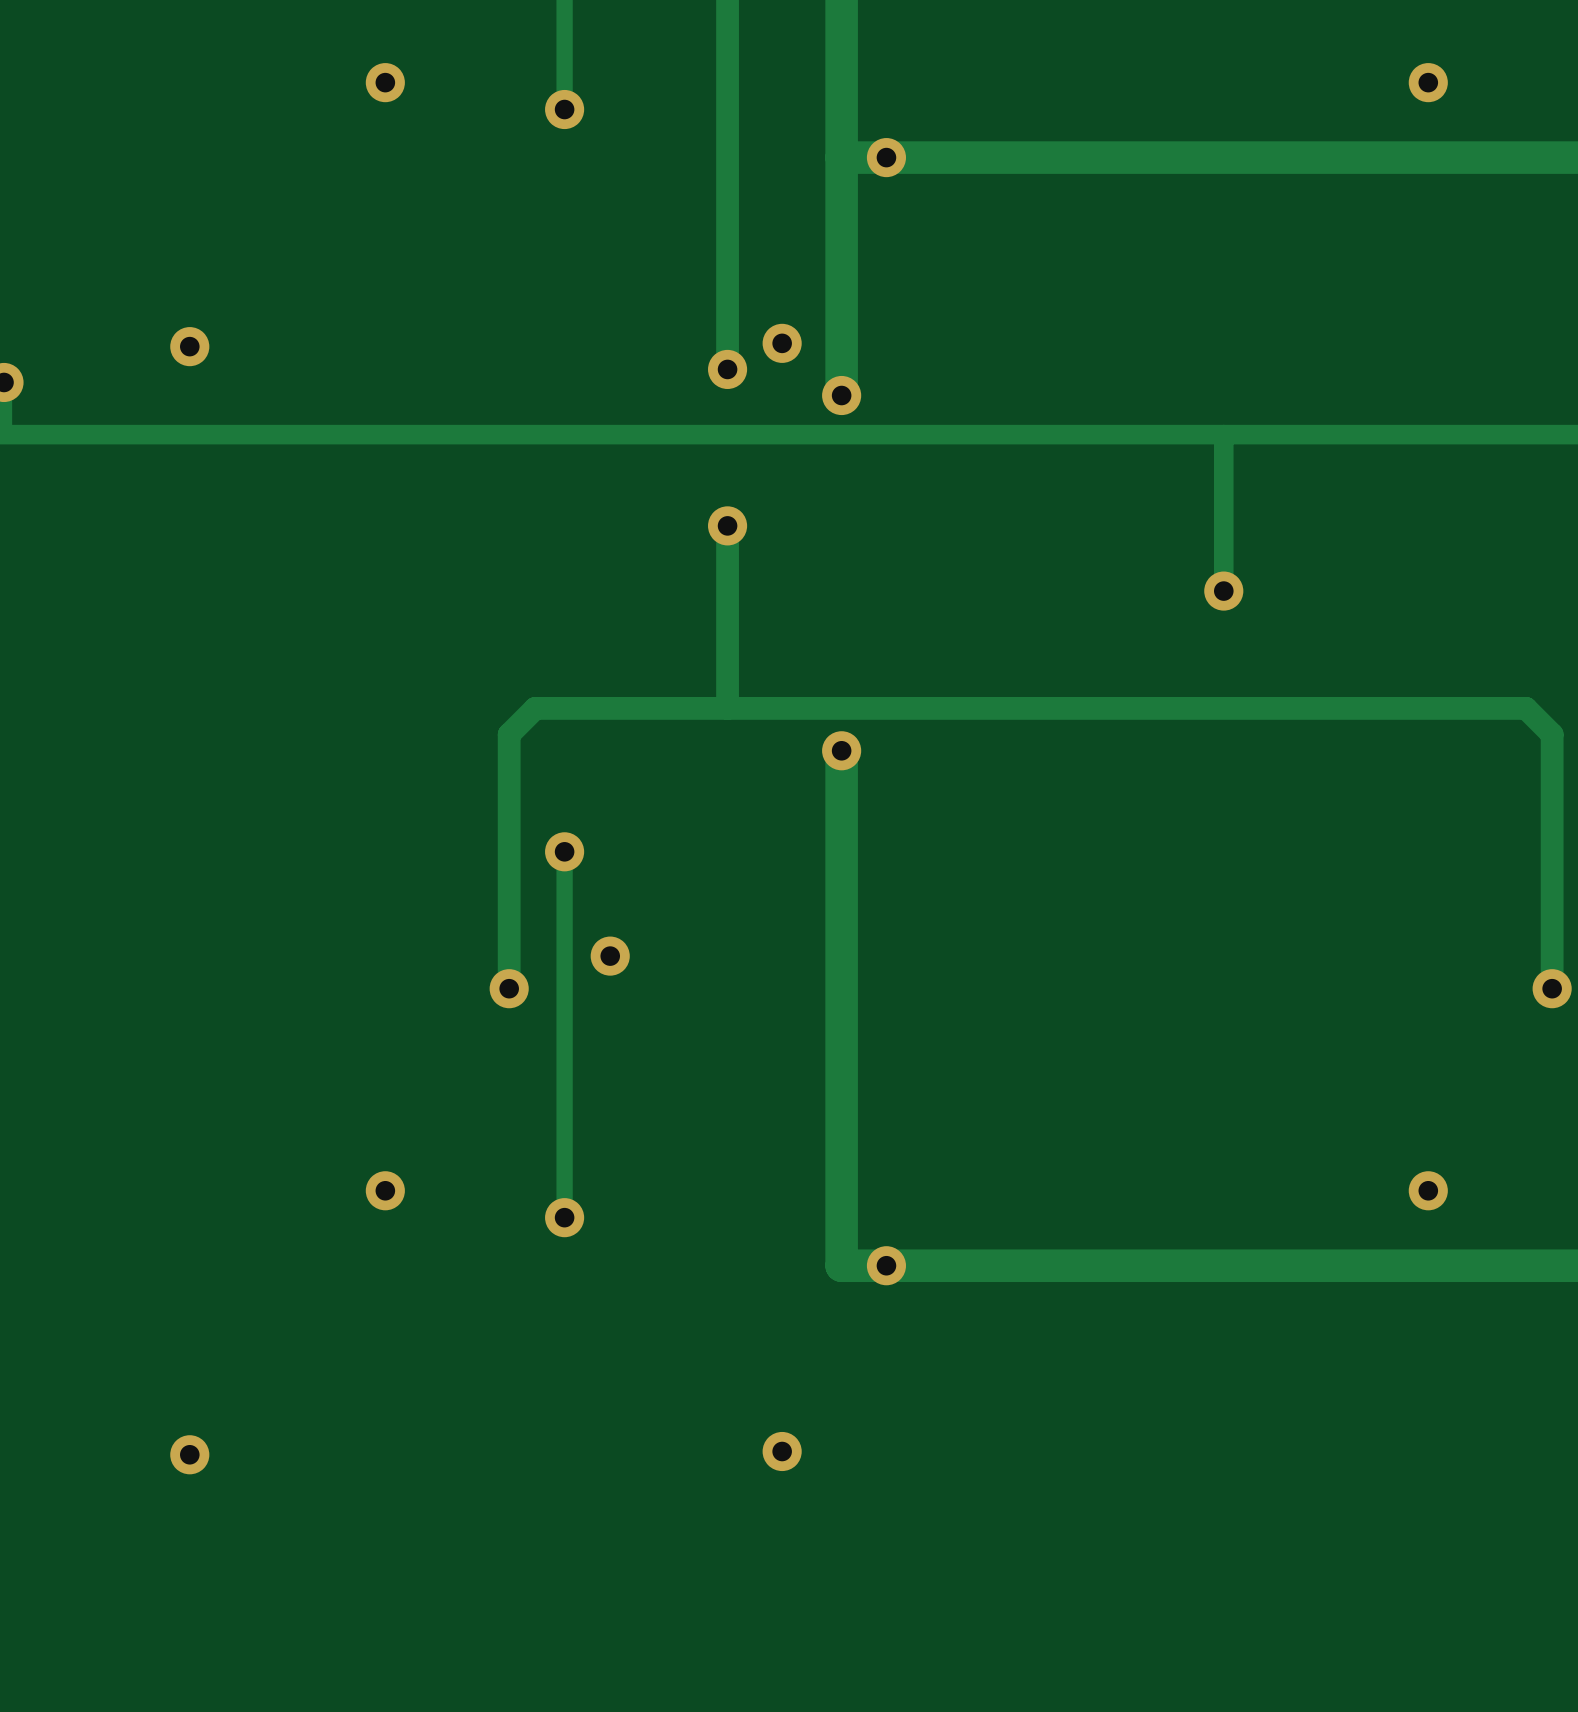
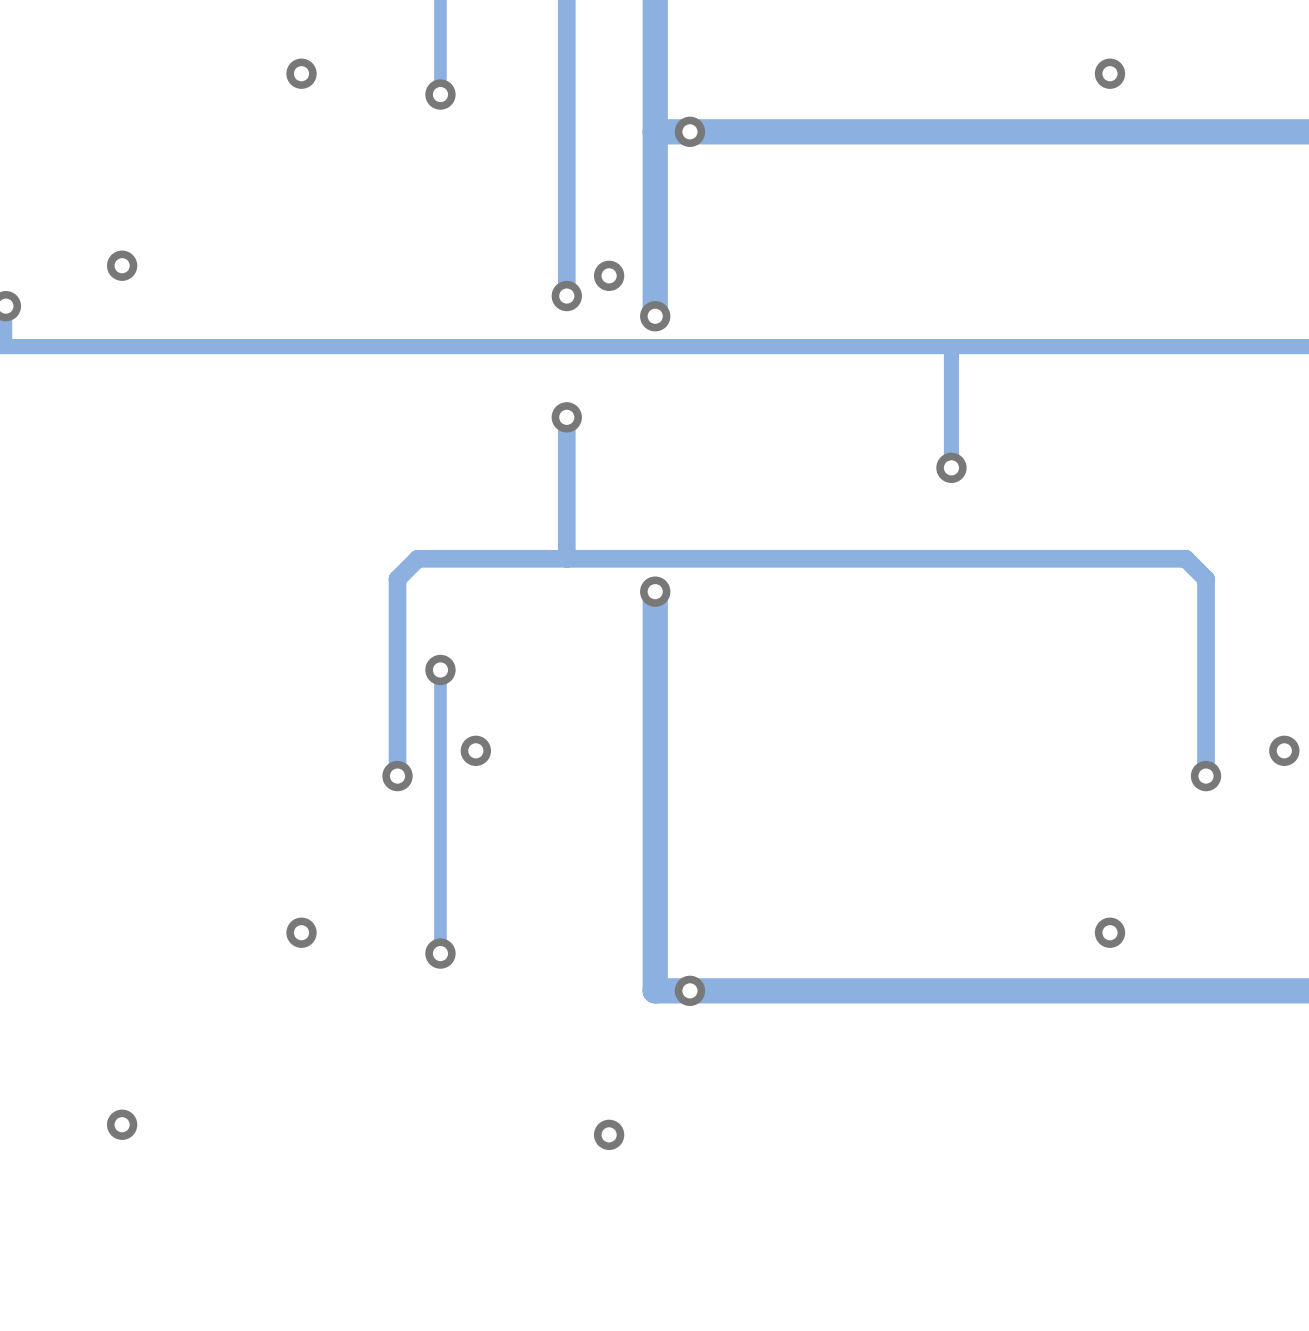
via position: (189, 346) -> (122, 265)
via position: (189, 1454) -> (122, 1124)

